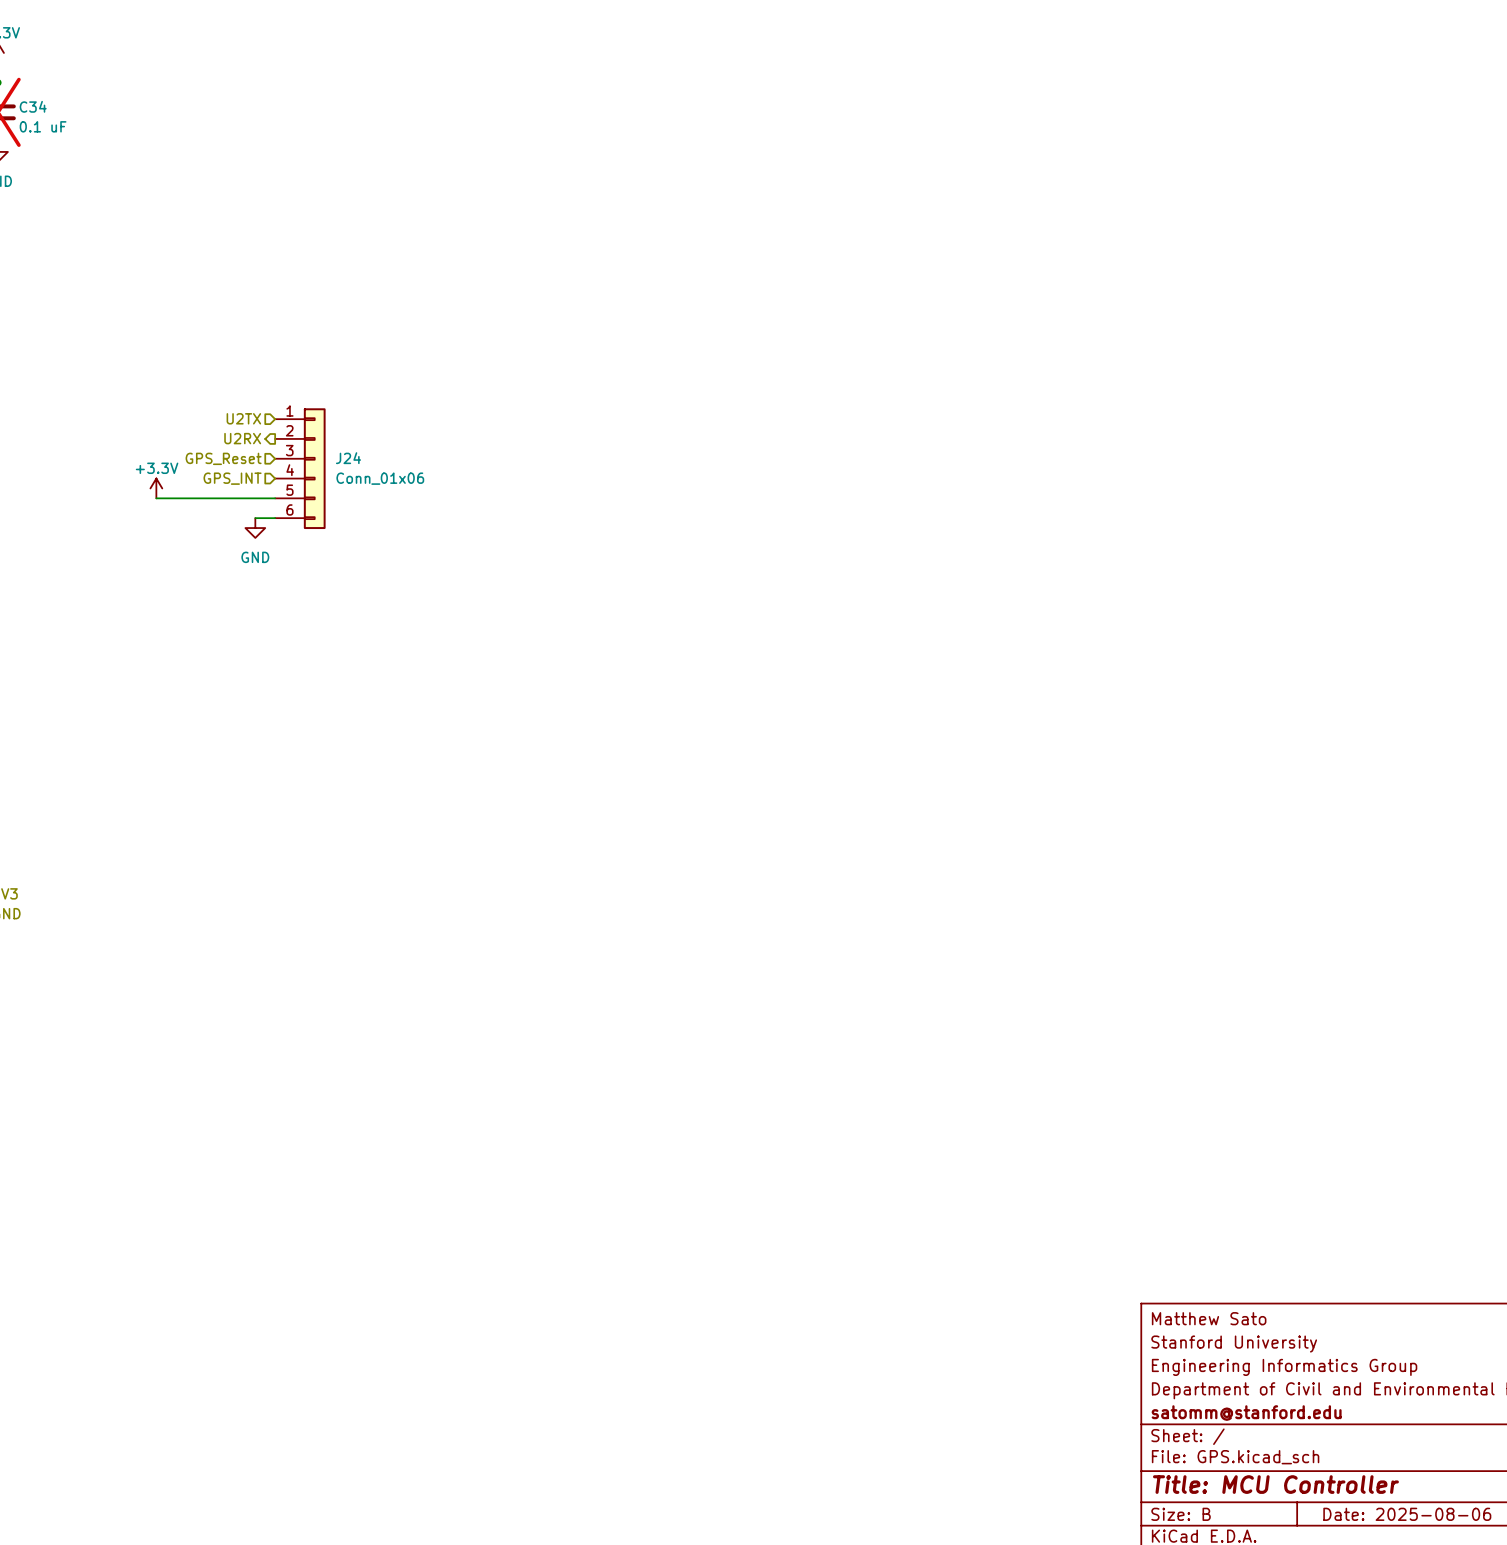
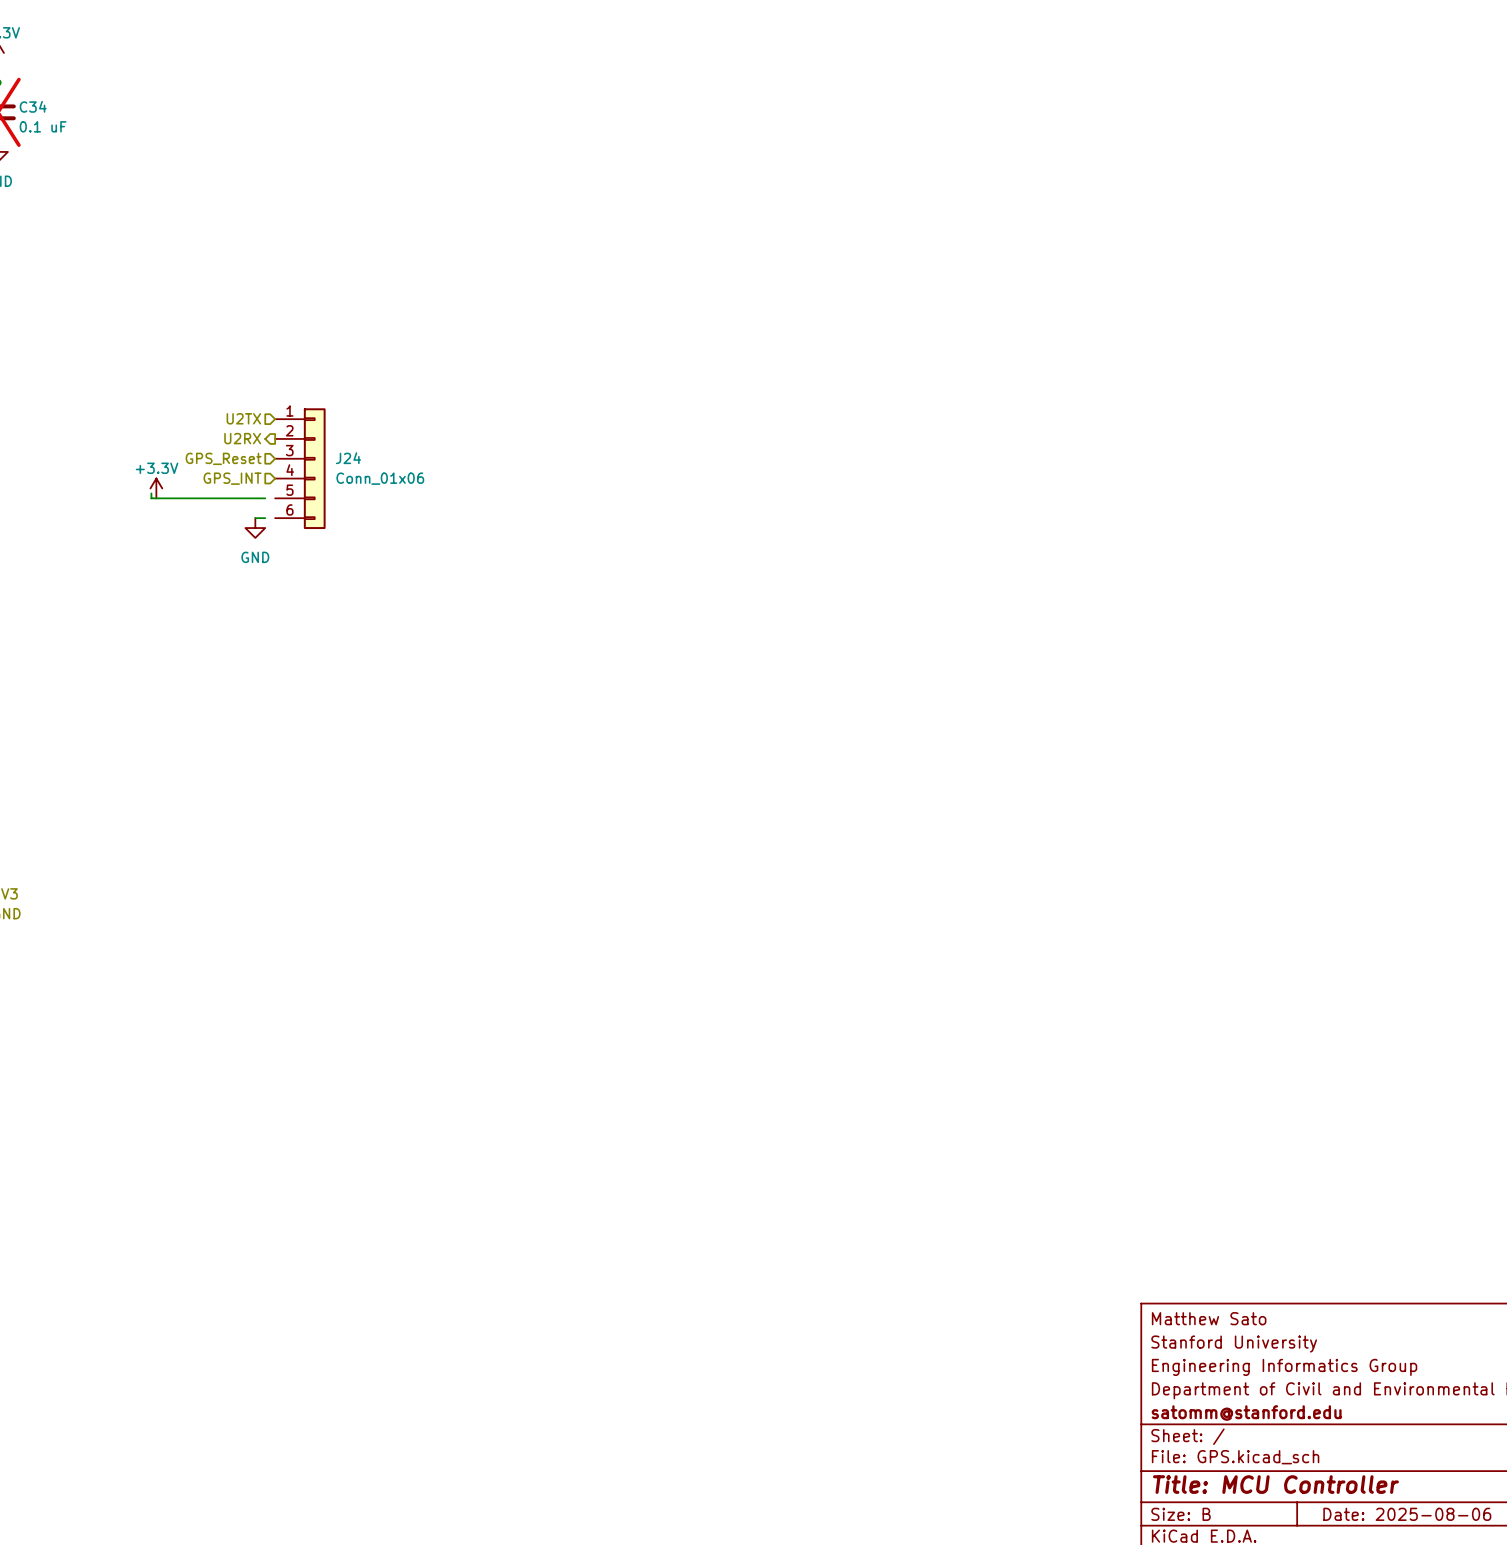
wire: none -> (151, 493) (151, 498) (156, 498)
wire: (265, 498) (275, 498) -> none
wire: (265, 518) (275, 518) -> none

